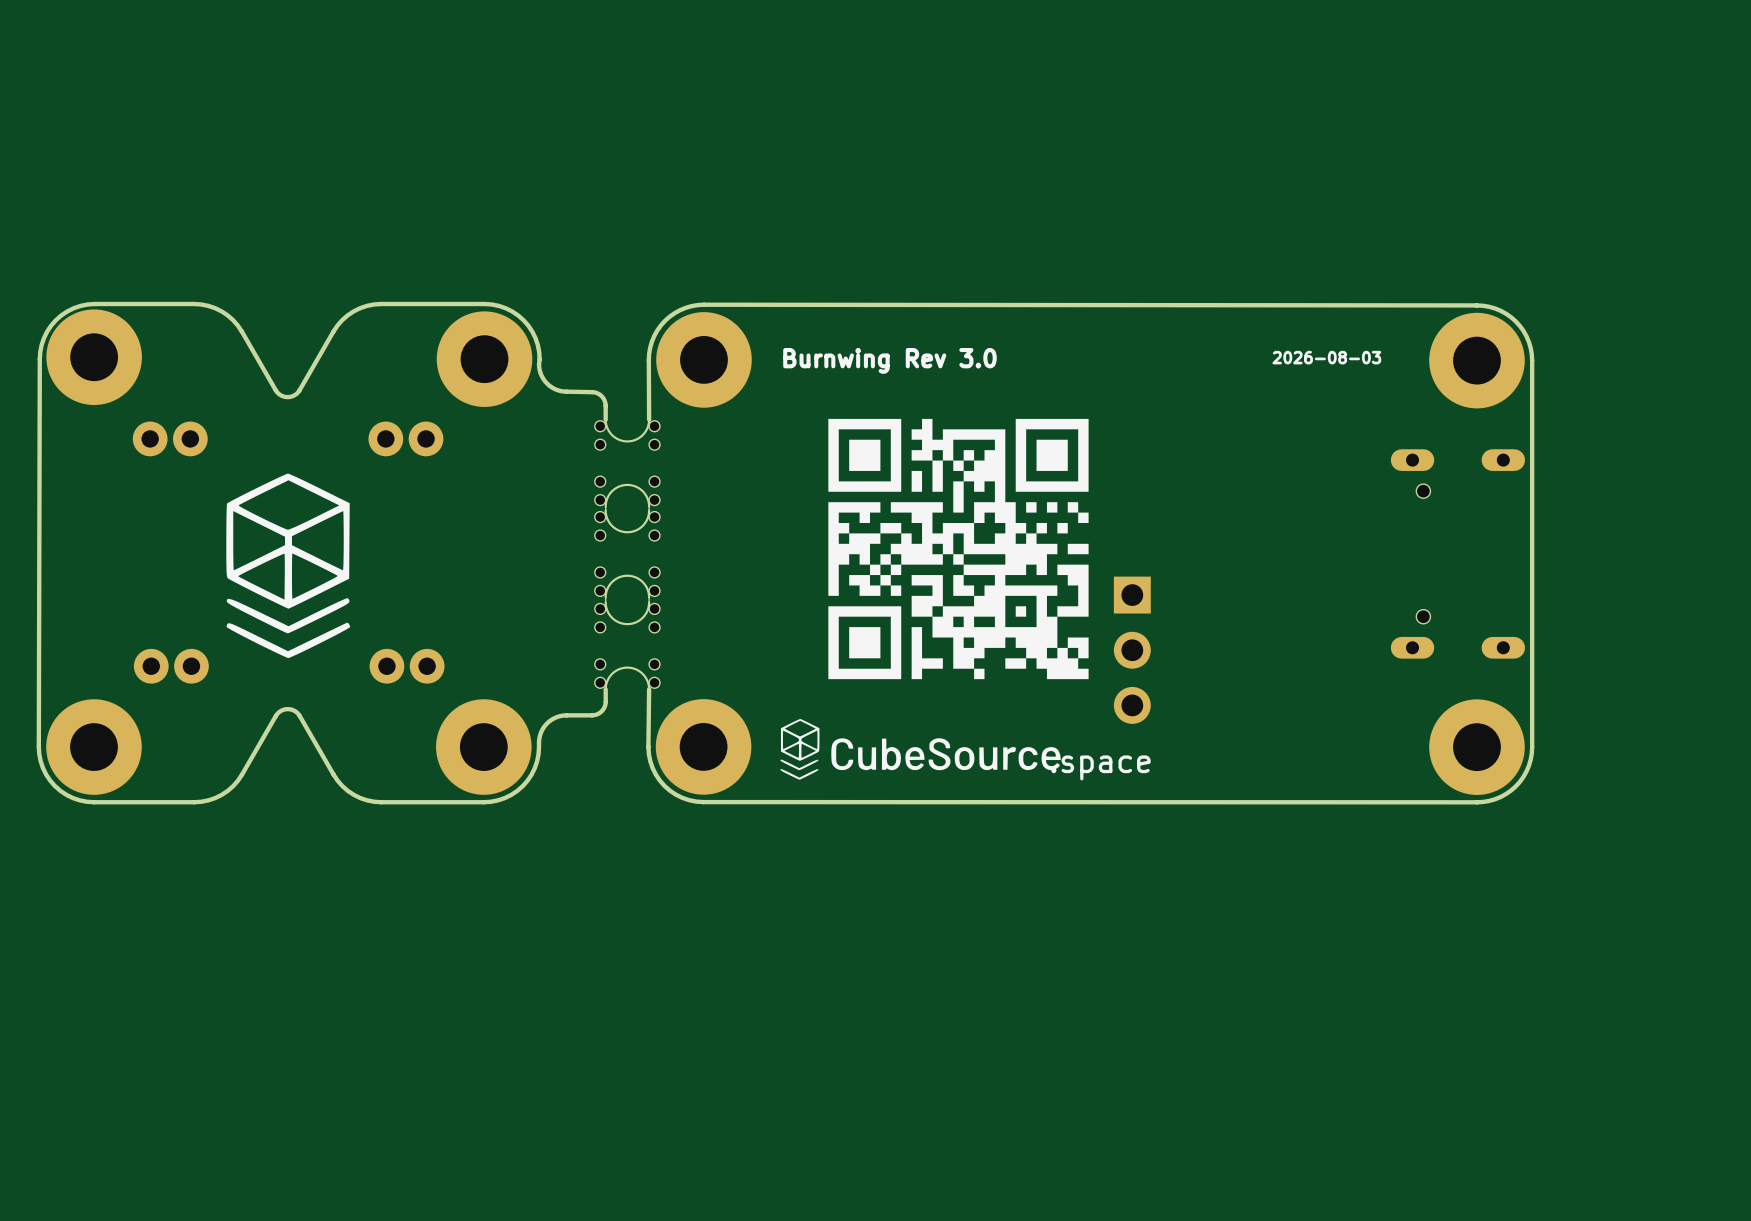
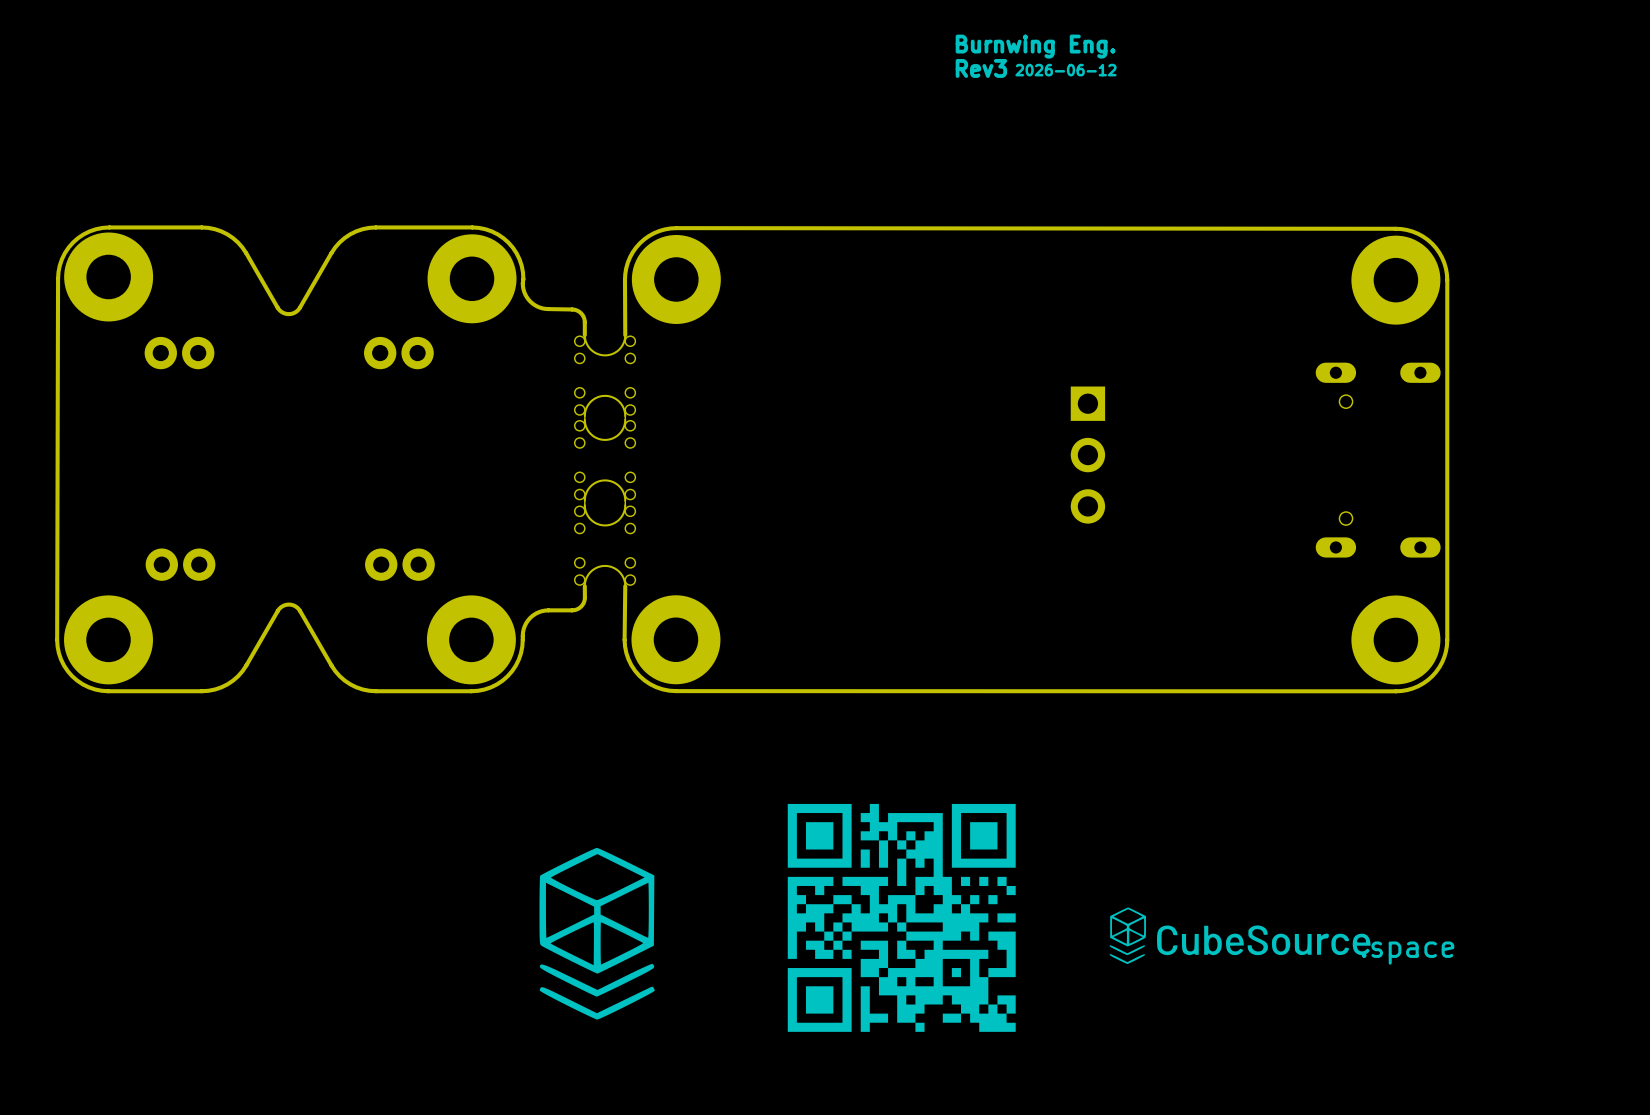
text: none -> Burnwing Eng. (1035, 46)
text: none -> Rev3 (981, 68)
text: none -> 2026-06-12 (1065, 70)
text: 2026-08-03 (1326, 357) -> none
text: Burnwing Rev 3.0 (889, 360) -> none
drawing: [828, 418, 1089, 680] -> none
drawing: [226, 473, 351, 659] -> none
part position: (1132, 650) -> (1087, 455)
.space position: (920, 749) -> (1240, 935)
drawing: none -> [787, 803, 1016, 1032]
drawing: none -> [539, 847, 655, 1020]

